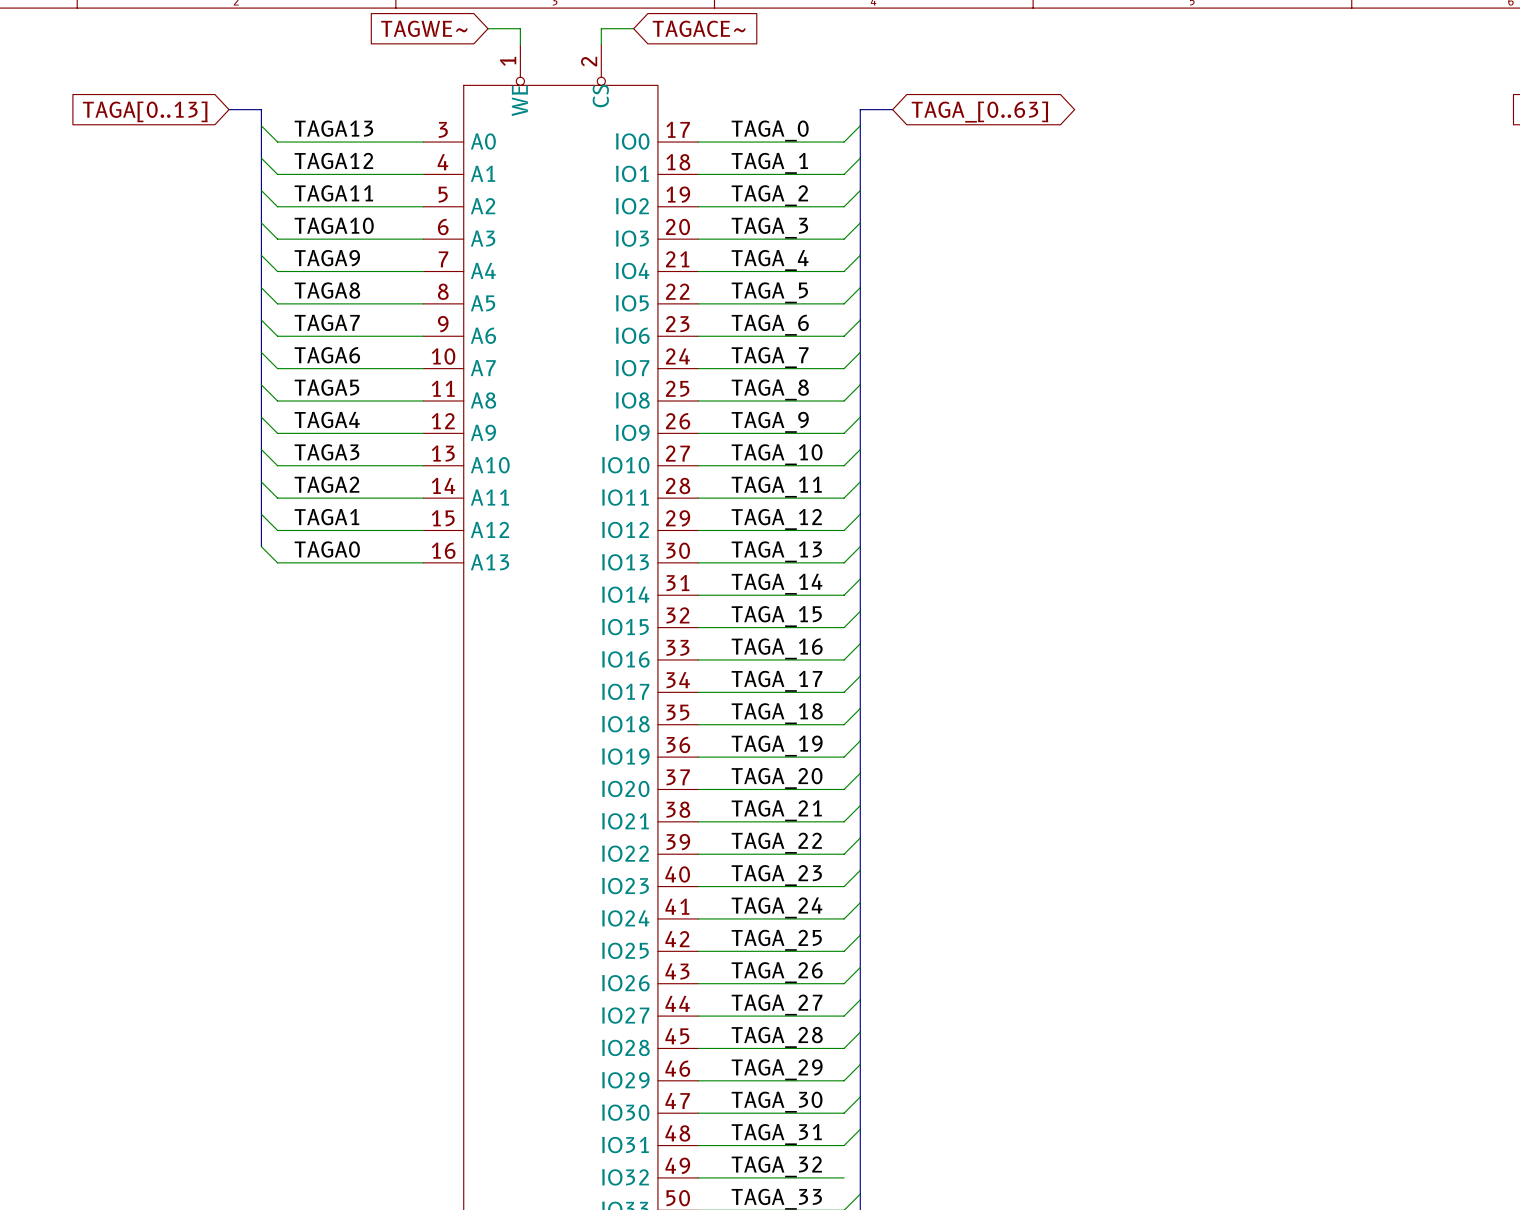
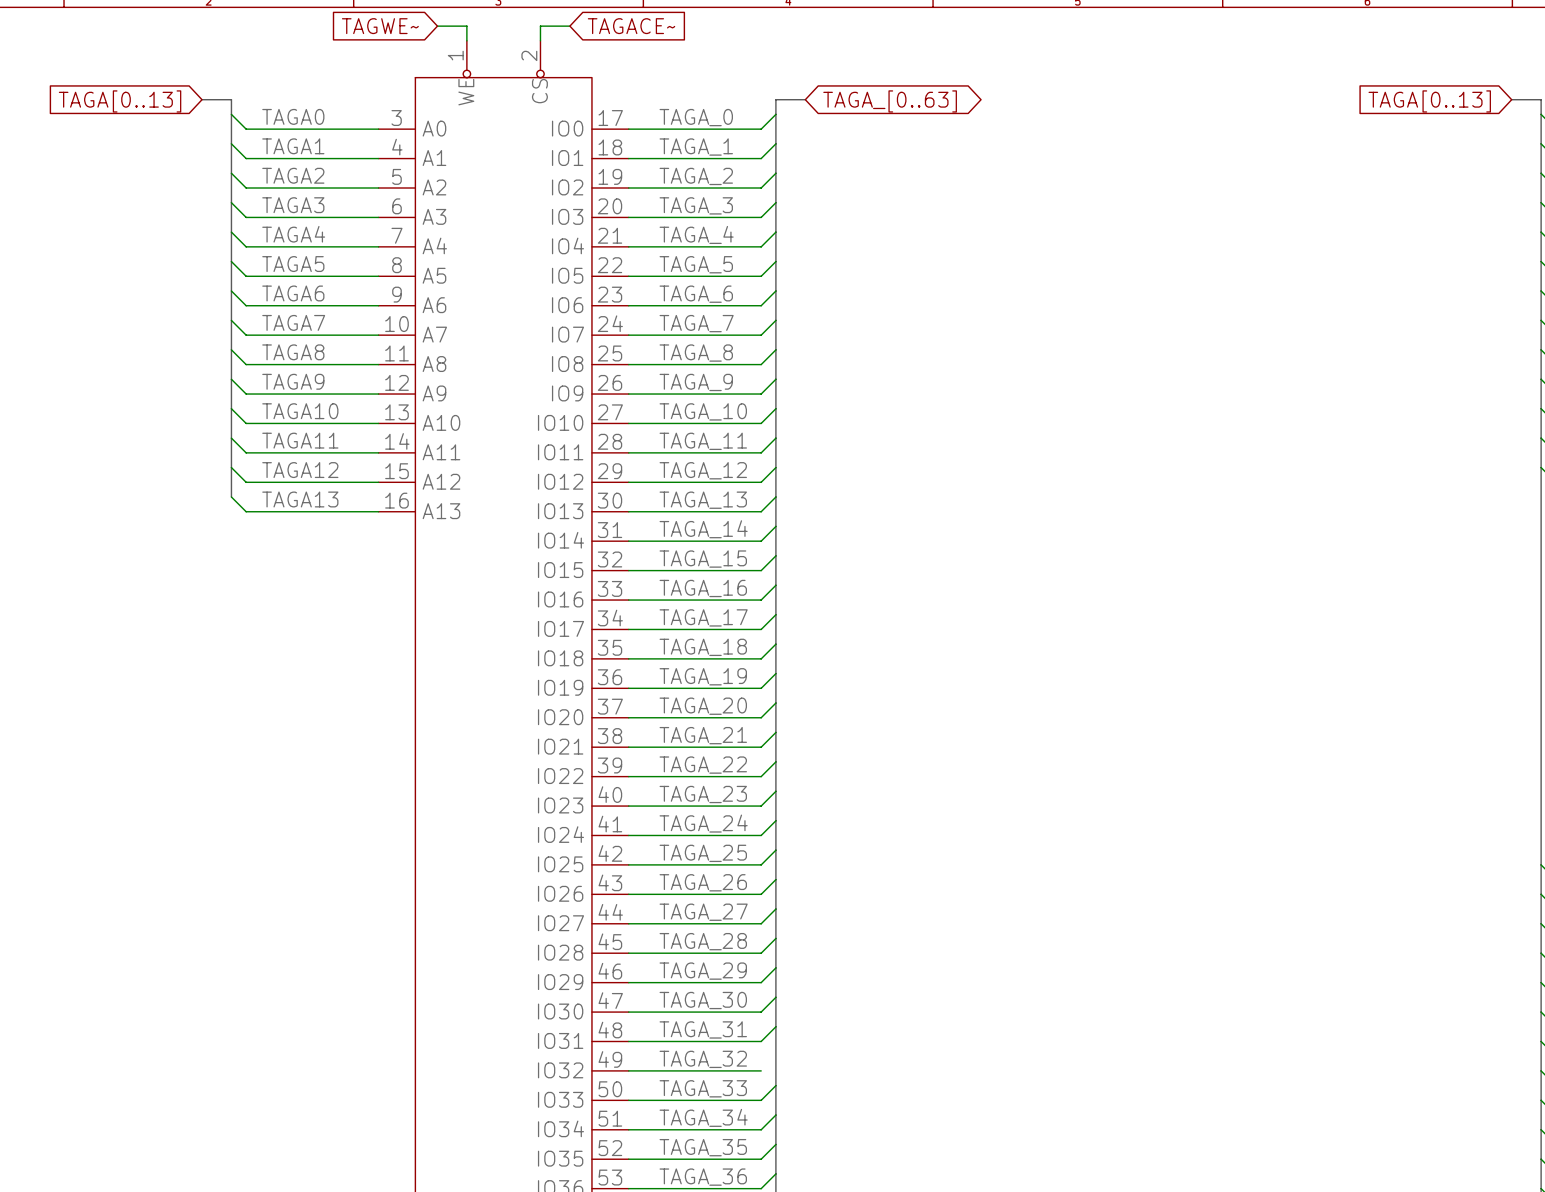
label: TAGA13 (333, 128) -> TAGA0 (293, 116)
label: TAGA12 (333, 161) -> TAGA1 (293, 146)
label: TAGA11 (333, 193) -> TAGA2 (293, 175)
label: TAGA10 (334, 225) -> TAGA3 (293, 205)
label: TAGA9 (327, 258) -> TAGA4 (293, 234)
label: TAGA8 (327, 290) -> TAGA5 (293, 264)
label: TAGA7 (327, 322) -> TAGA6 (293, 293)
label: TAGA6 (327, 355) -> TAGA7 (293, 322)
label: TAGA5 (326, 387) -> TAGA8 (293, 352)
label: TAGA4 (327, 419) -> TAGA9 (293, 381)
label: TAGA3 (326, 452) -> TAGA10 (300, 411)
label: TAGA2 (326, 484) -> TAGA11 (300, 440)
label: TAGA1 (326, 517) -> TAGA12 (300, 470)
label: TAGA0 (327, 549) -> TAGA13 (300, 499)

